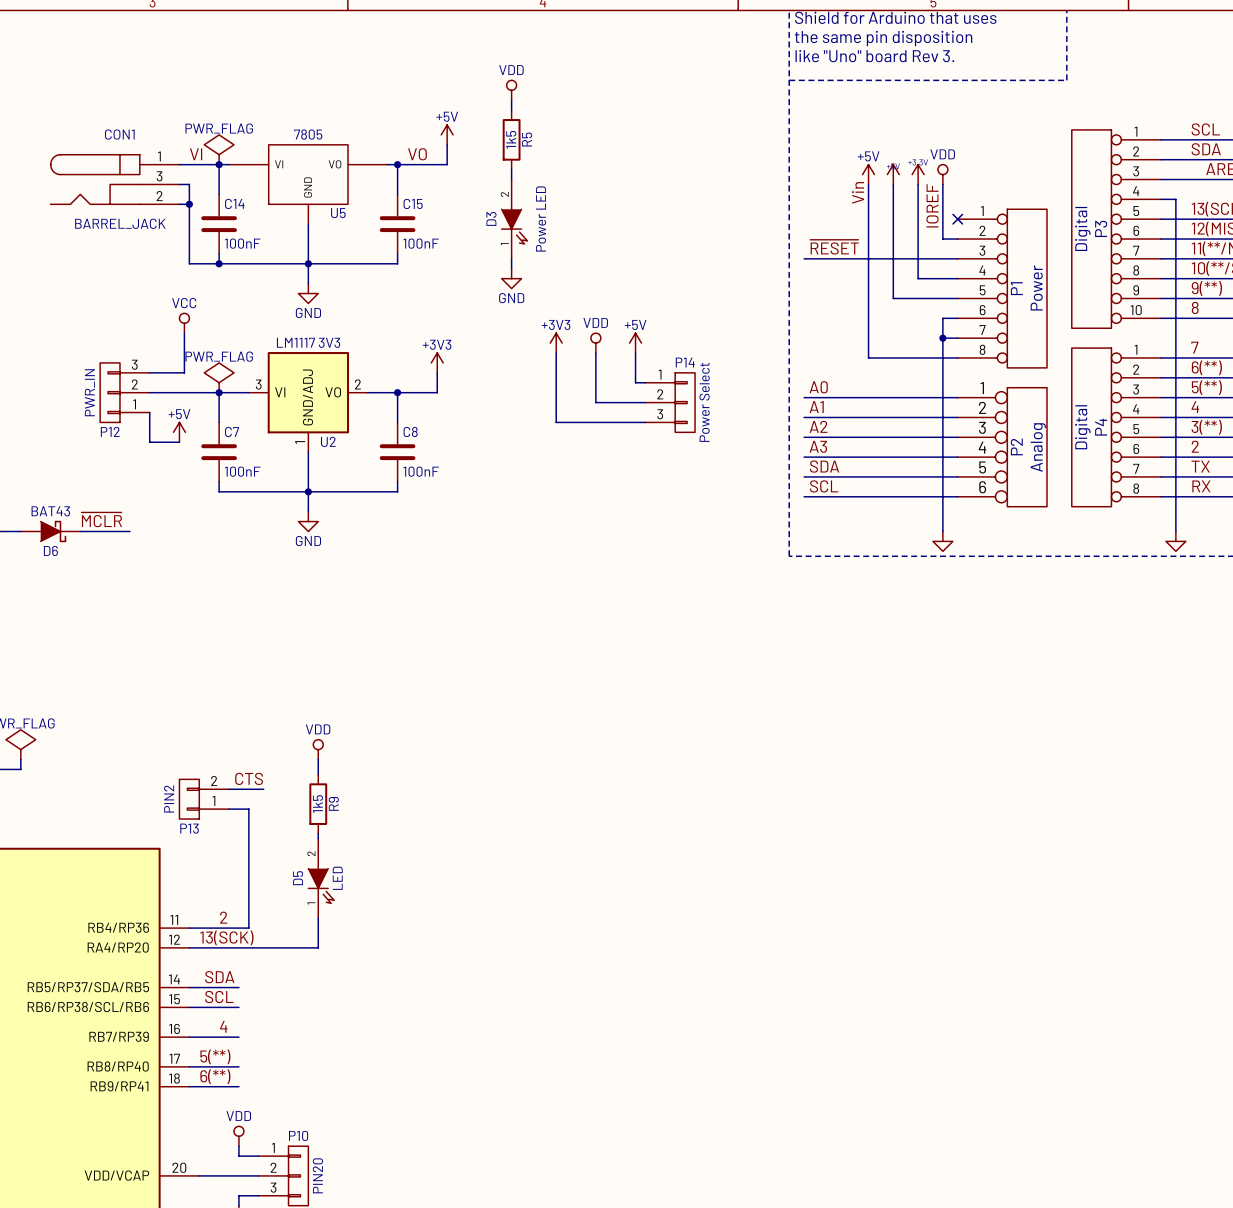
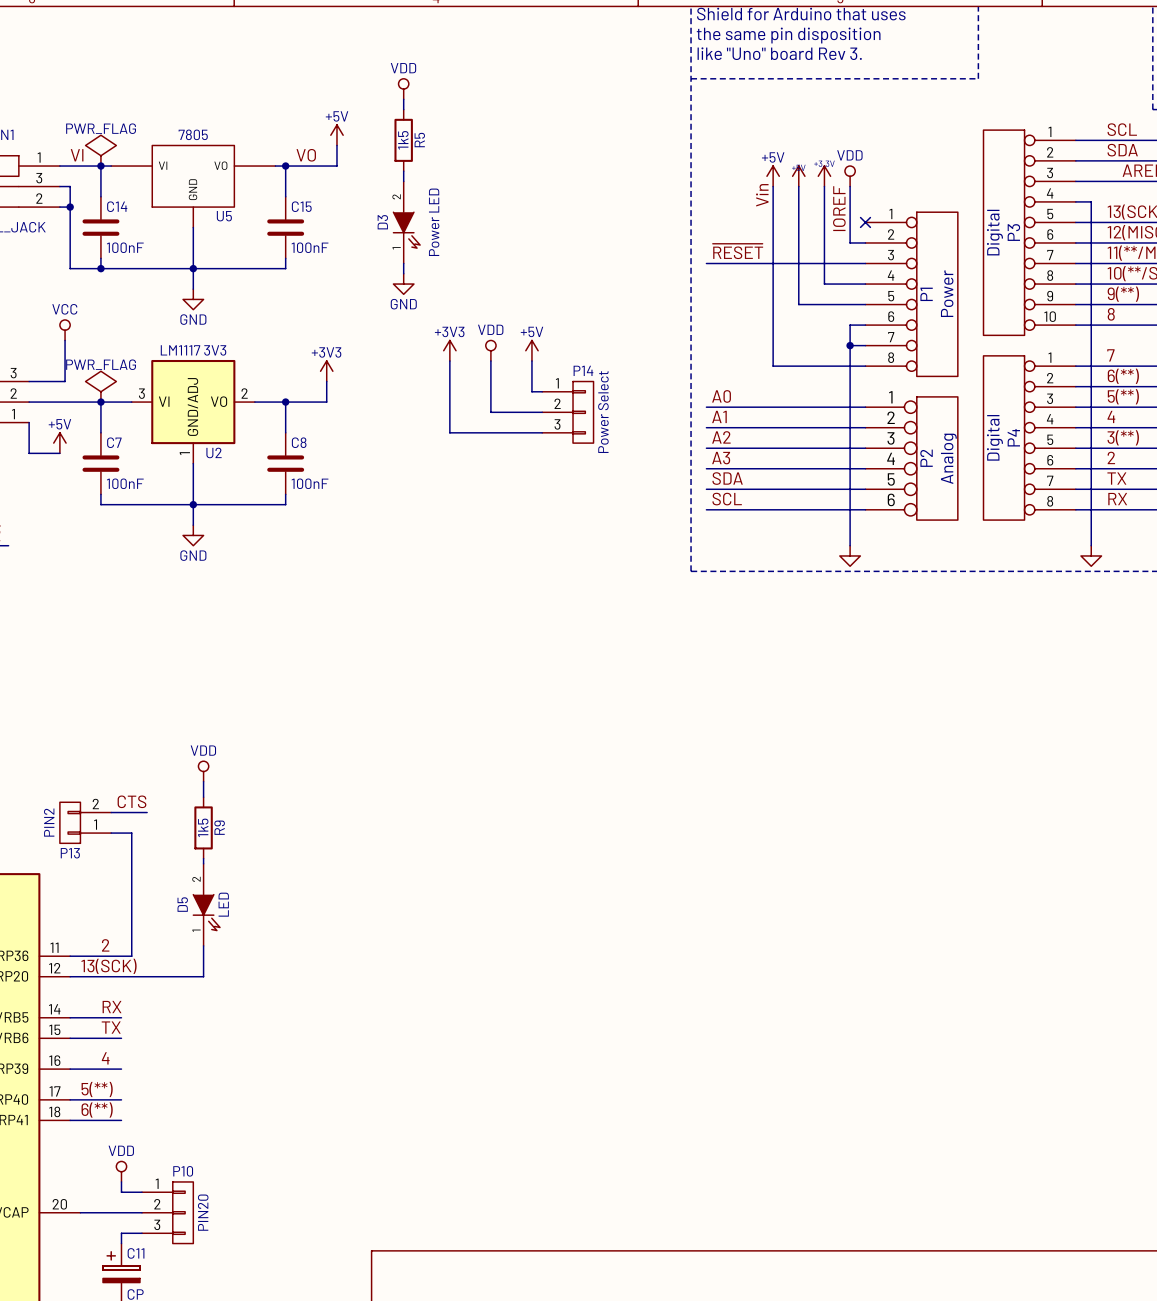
label: SDA (219, 977) -> none
label: none -> RX (112, 1007)
label: SCL (219, 997) -> none
label: none -> TX (111, 1027)

